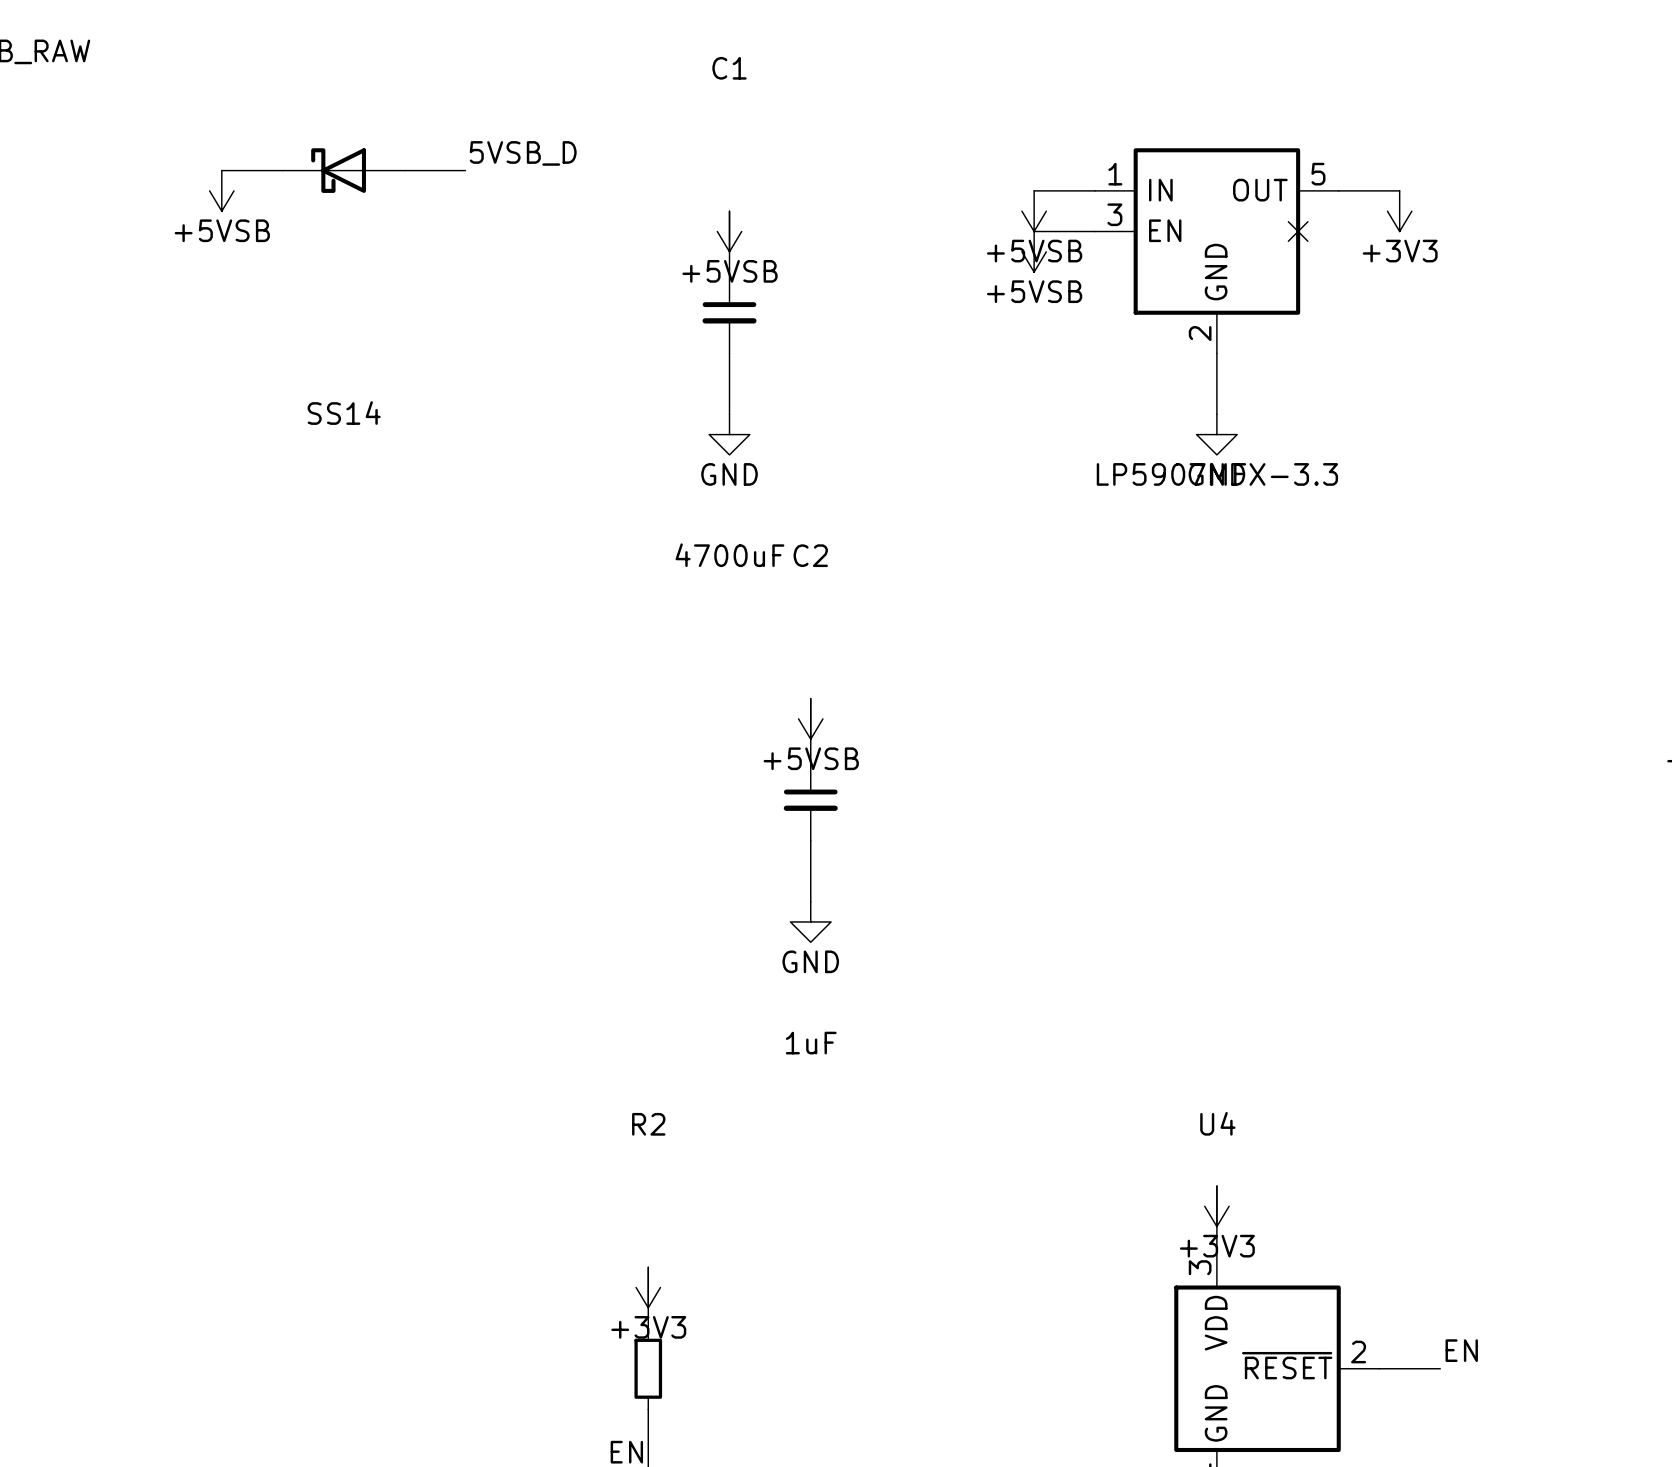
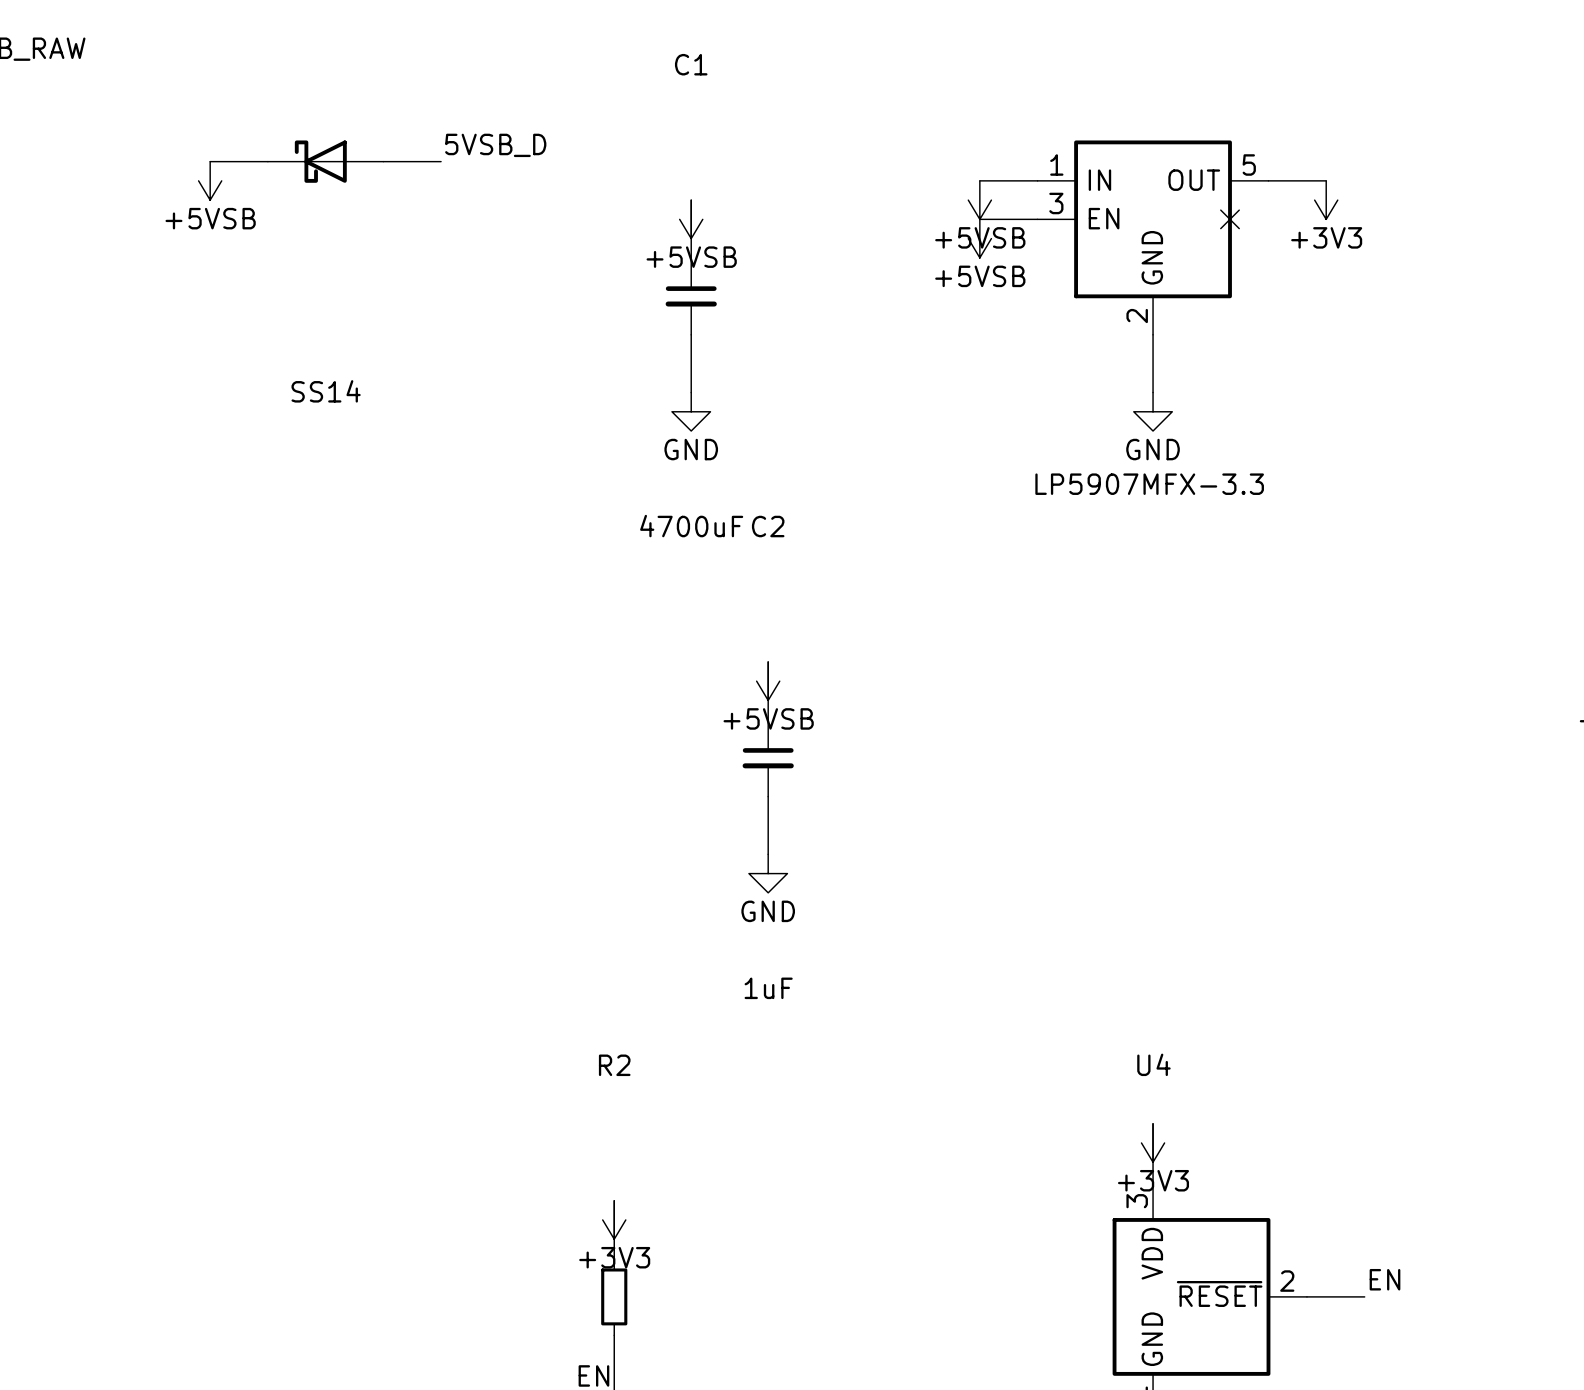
part value position: LP5907MFX-3.3 (1217, 474) -> LP5907MFX-3.3 (1149, 484)

